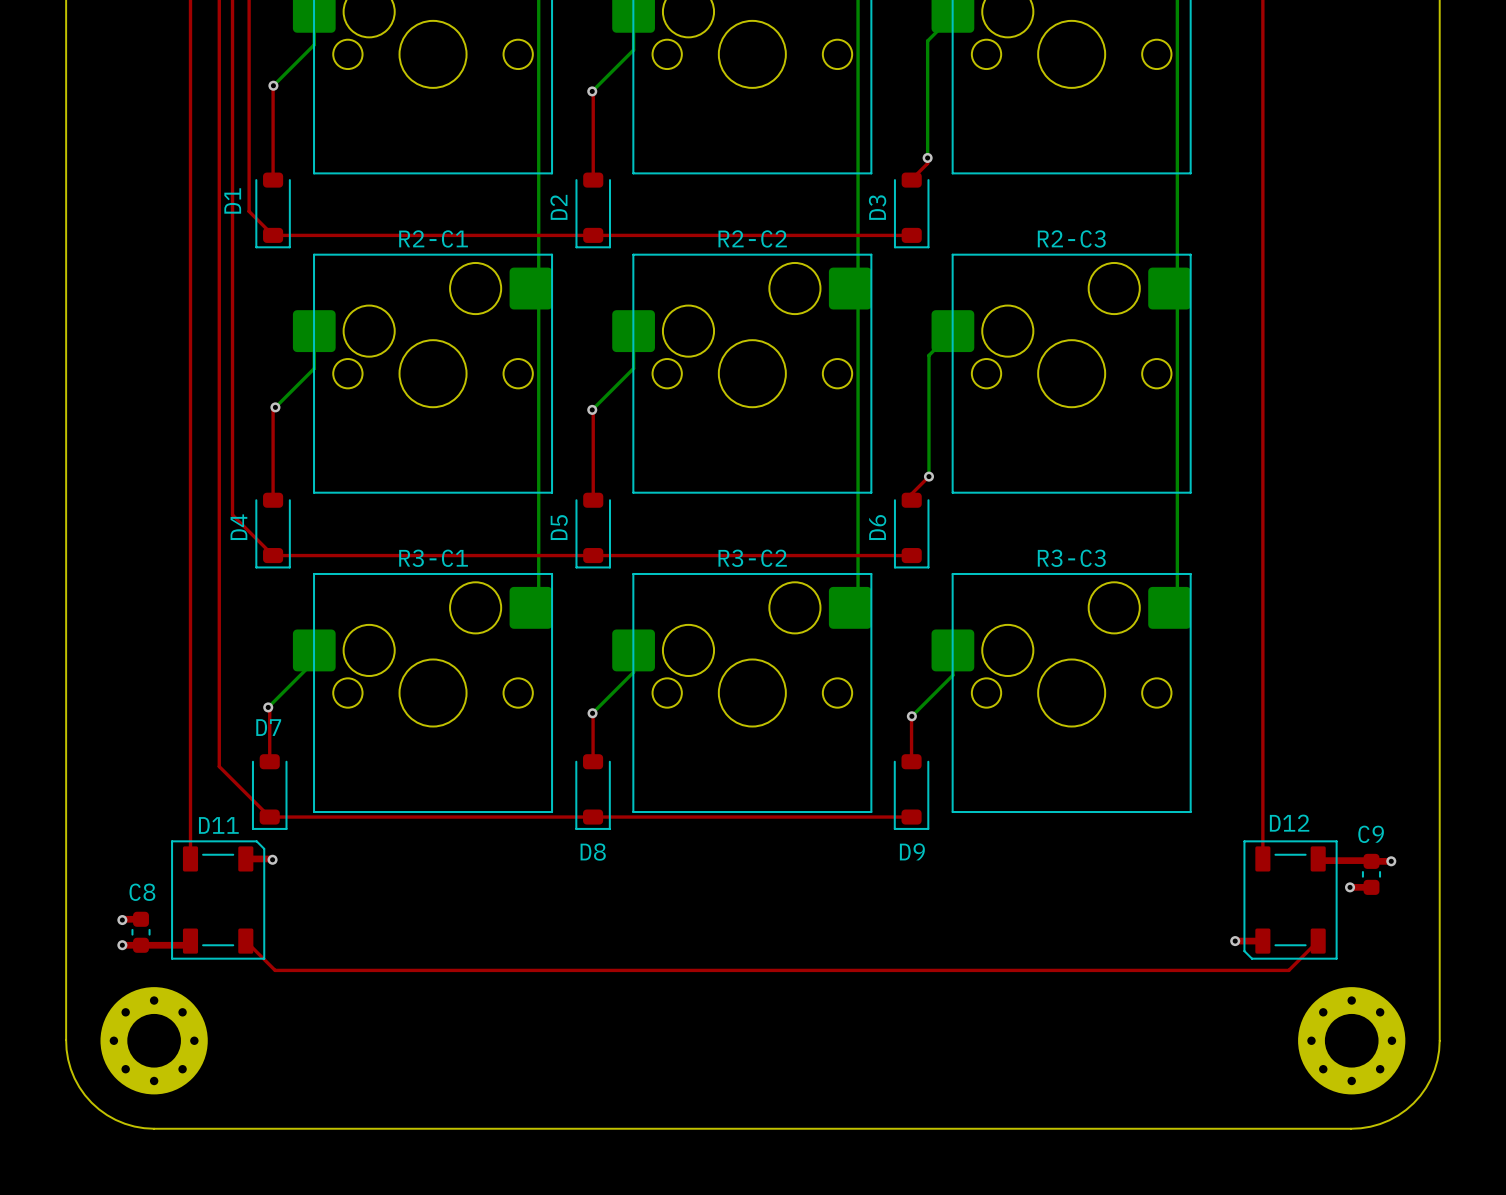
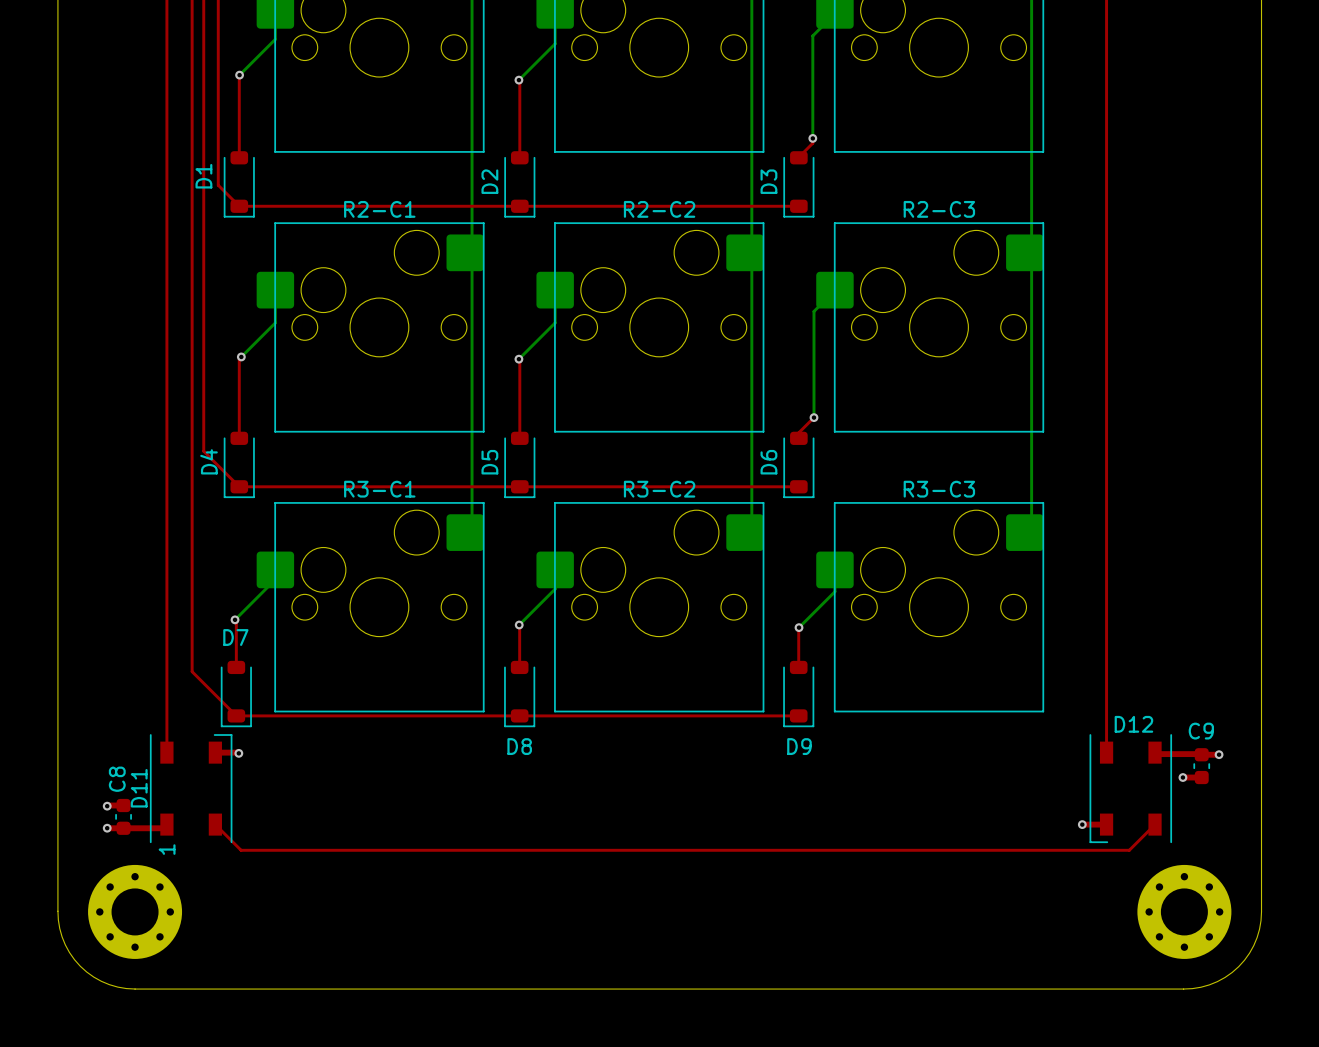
D11 name position: D11 (218, 825) -> D11 (139, 788)
D11 footprint: [171, 840, 266, 960] -> [149, 734, 233, 844]
D12 footprint: [1243, 840, 1338, 960] -> [1089, 734, 1173, 844]
C8 name rotation: 0° (142, 892) -> 90° counterclockwise (117, 779)

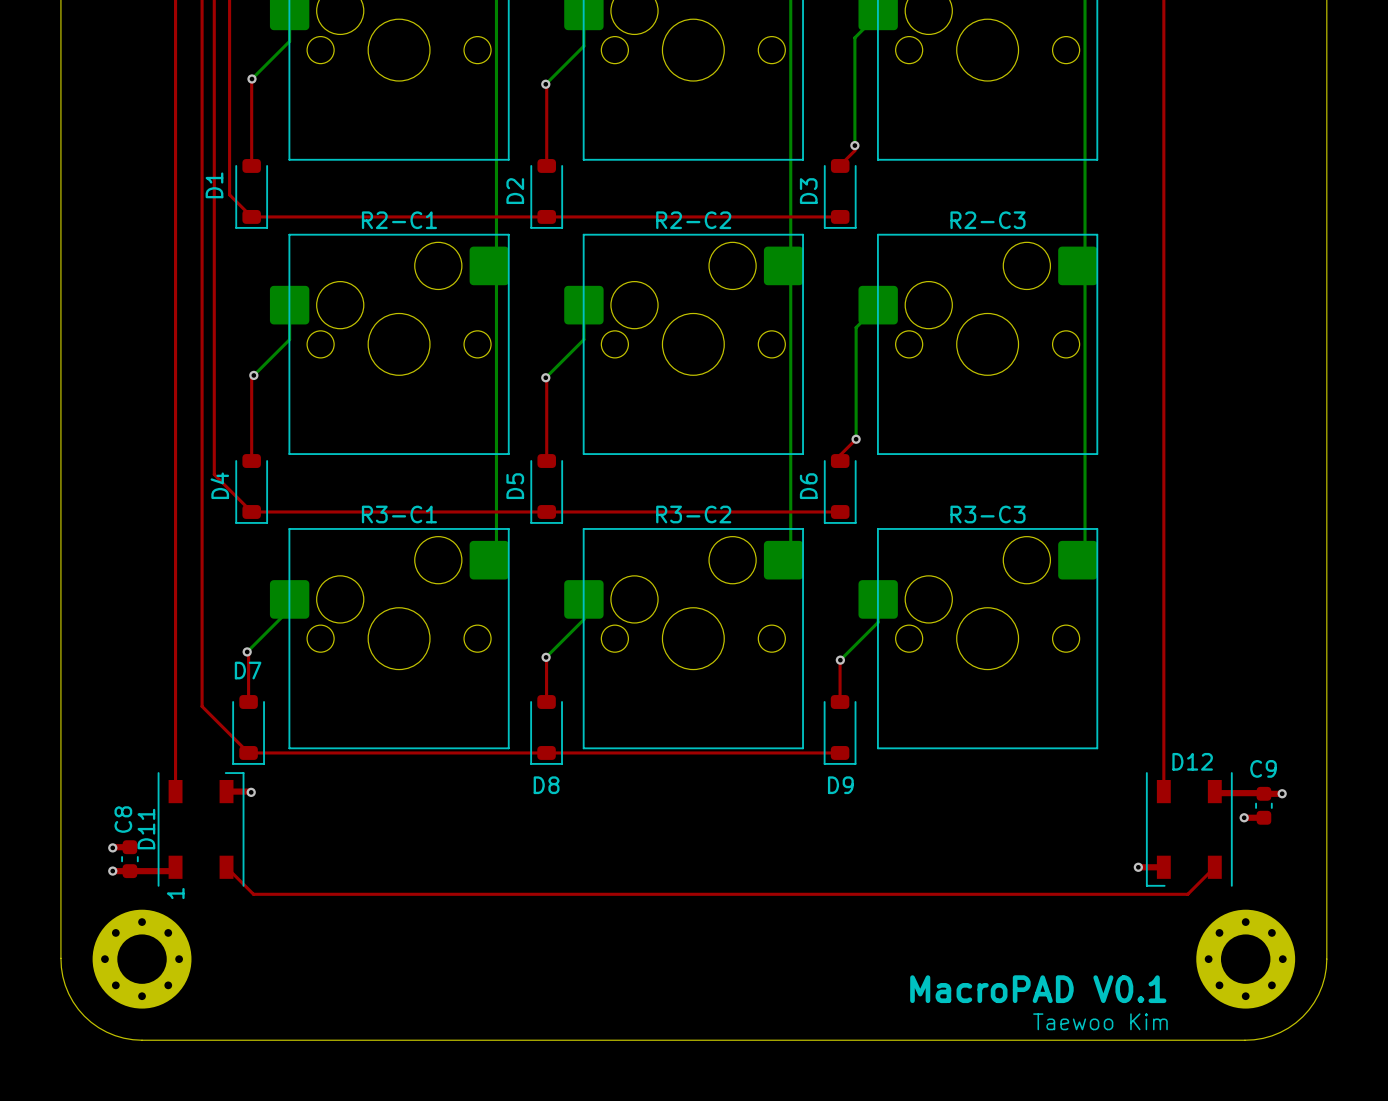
text: none -> MacroPAD V0.1 (1038, 989)
text: none -> Taewoo Kim (1100, 1021)

